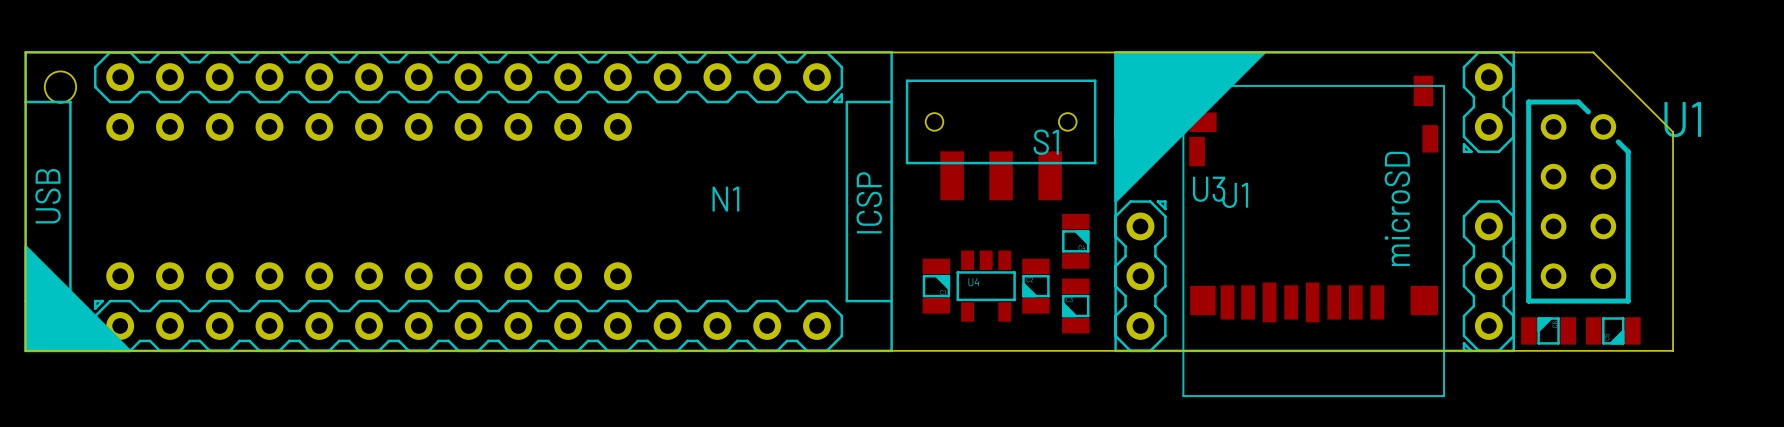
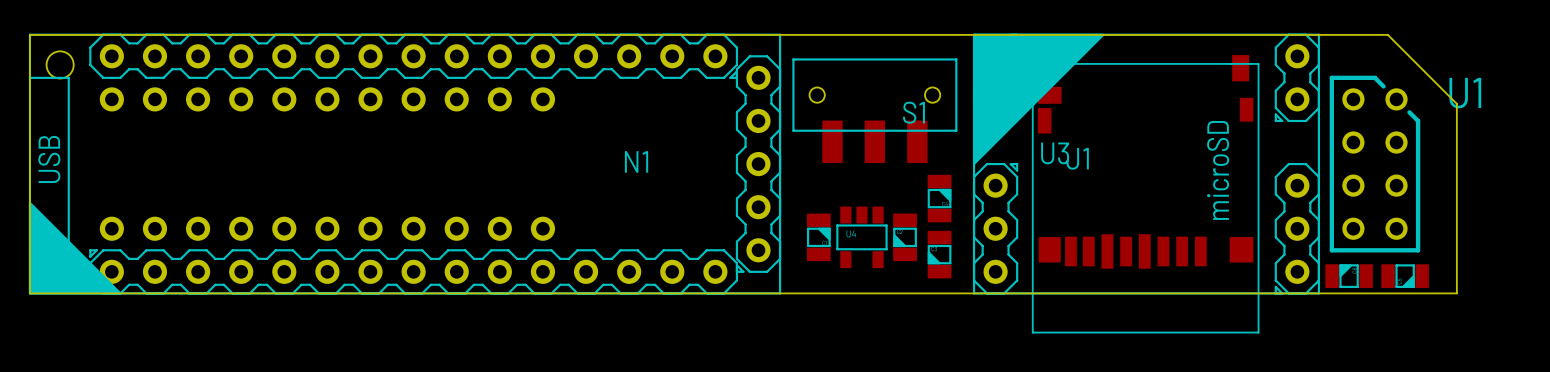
N1 footprint: [24, 51, 893, 353] -> [28, 33, 782, 295]

